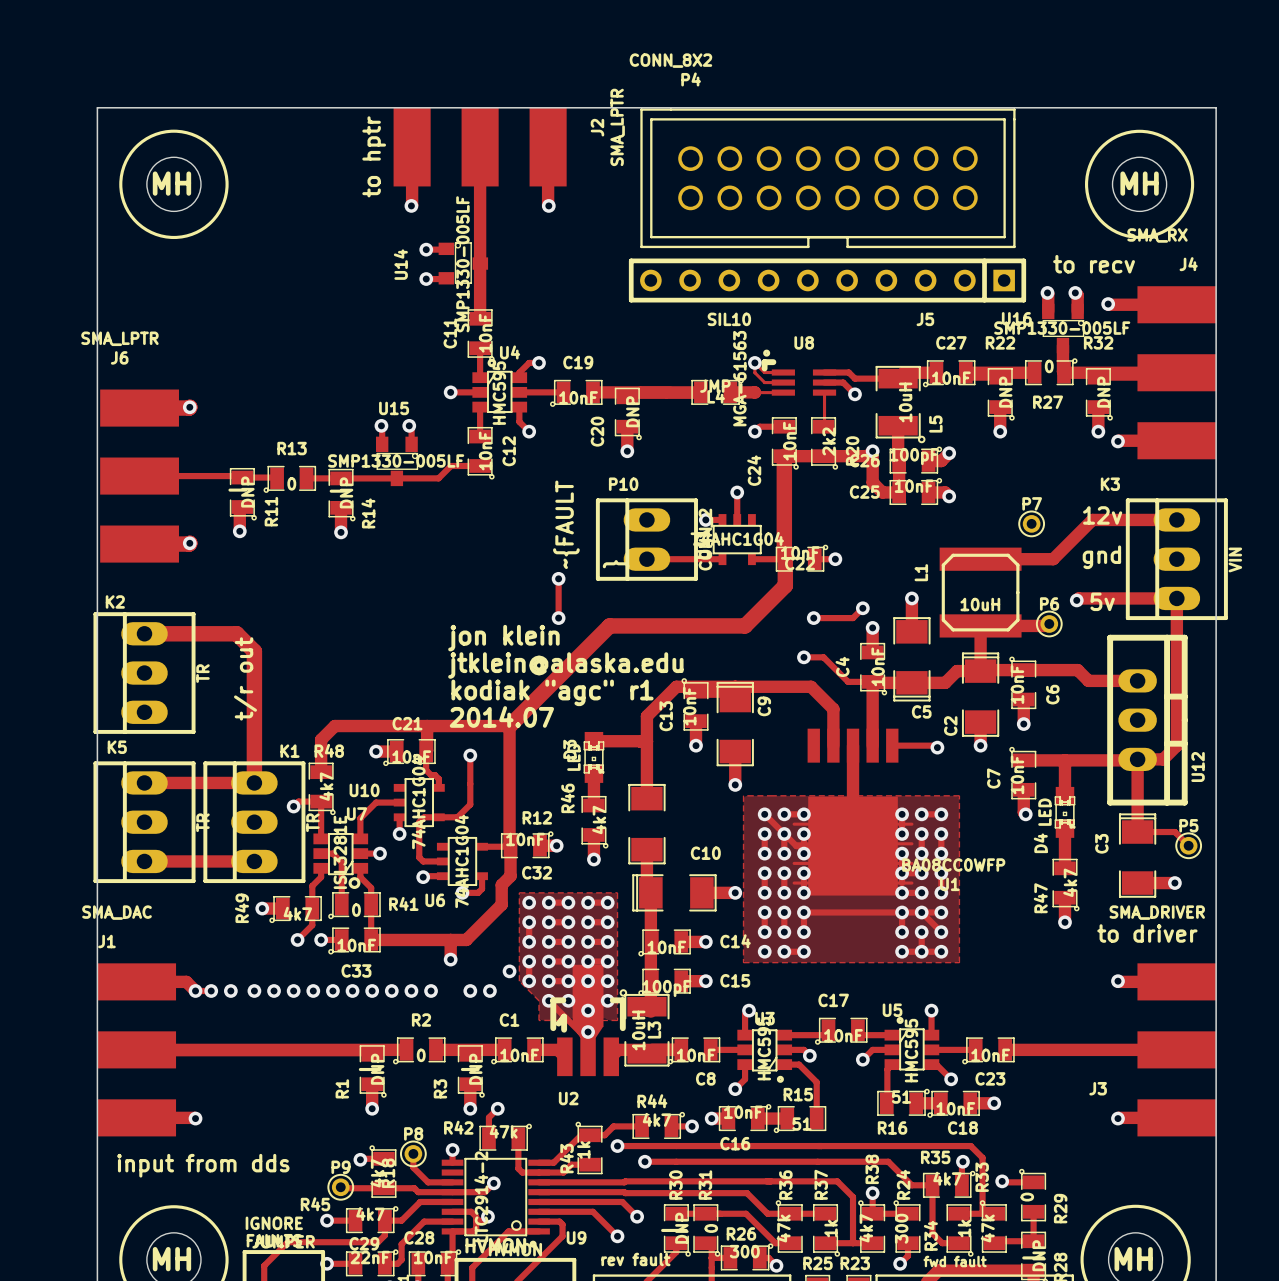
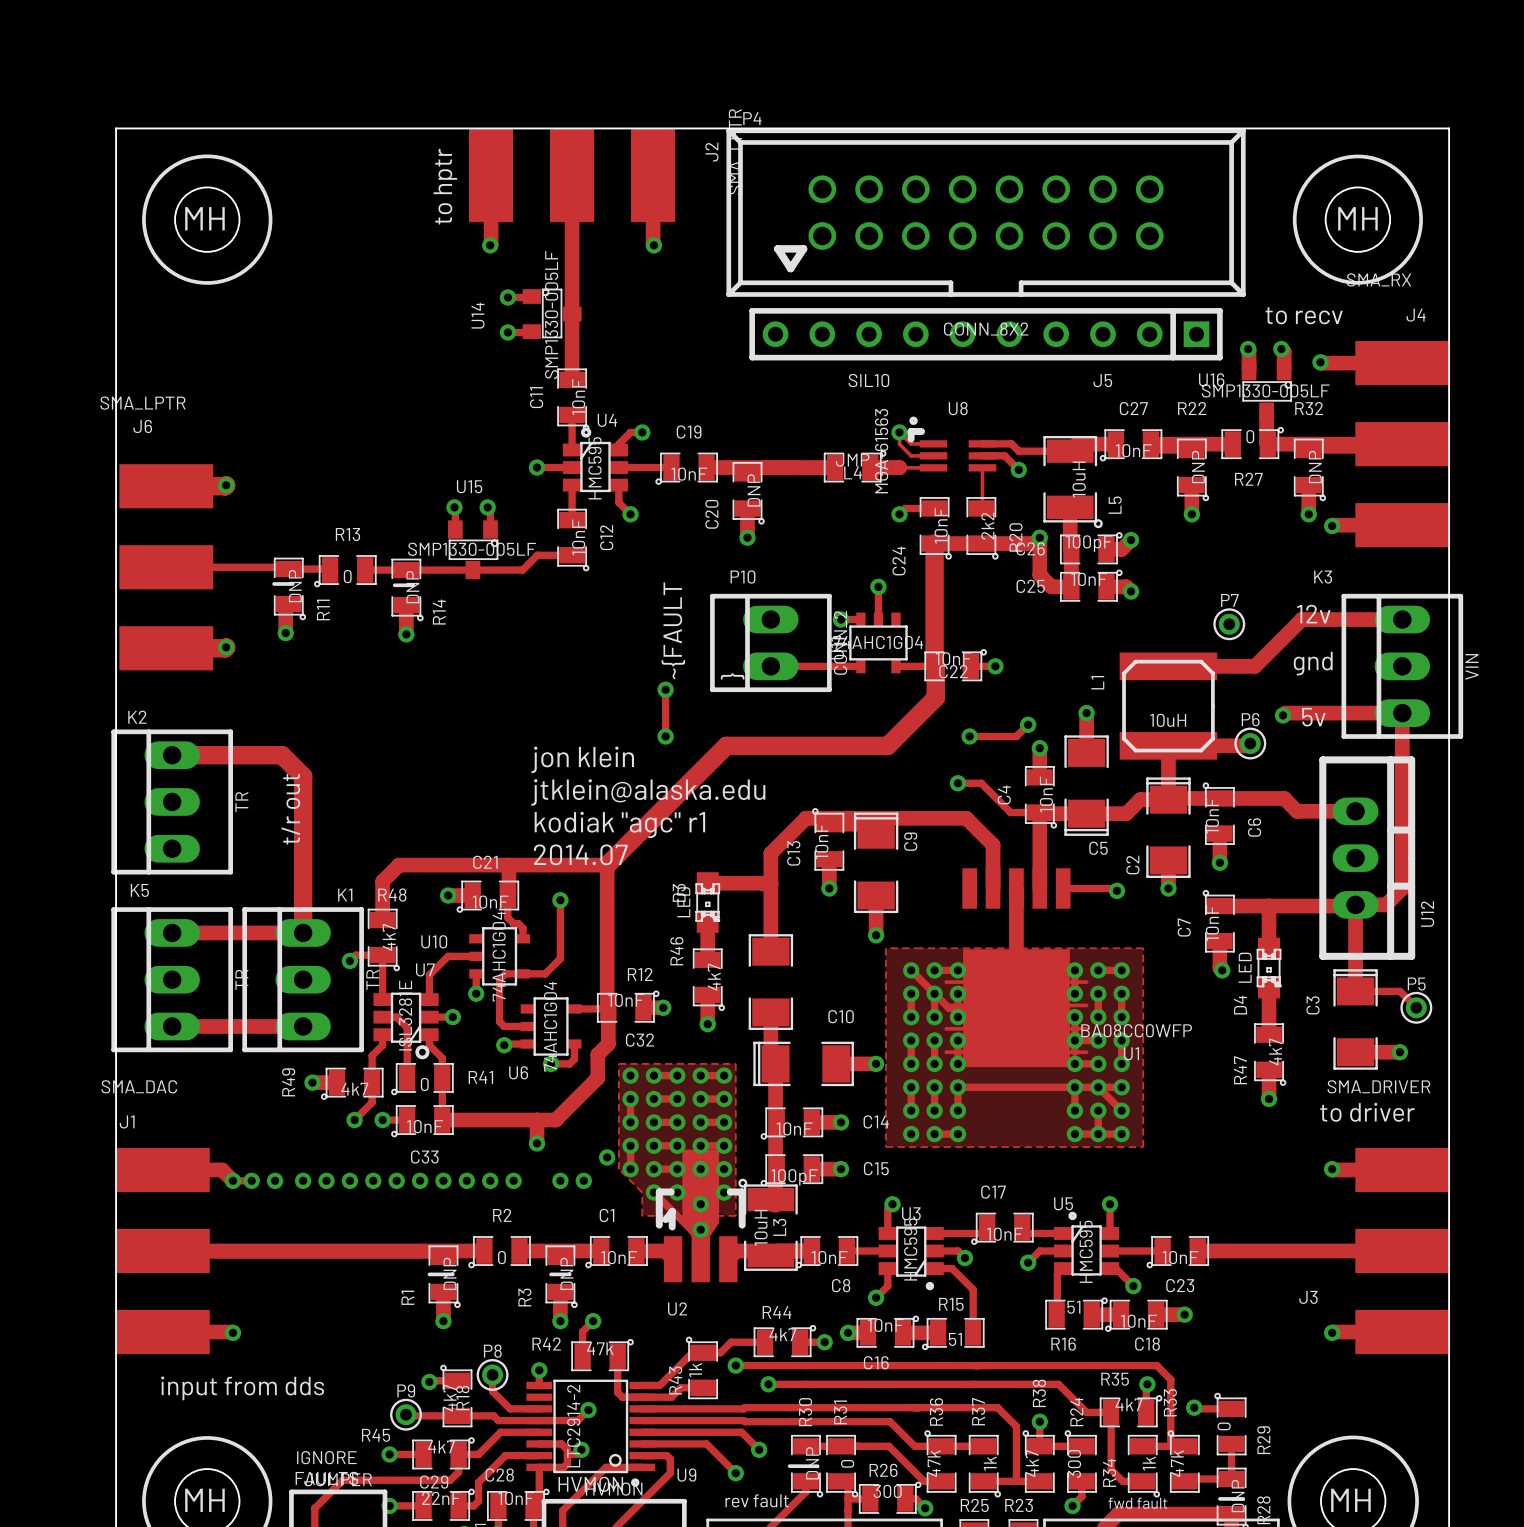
P4 value position: CONN_8X2 (670, 60) -> CONN_8X2 (986, 329)
P4 name position: P4 (691, 79) -> P4 (752, 118)
P4 footprint: [640, 108, 1016, 249] -> [726, 128, 1246, 297]

